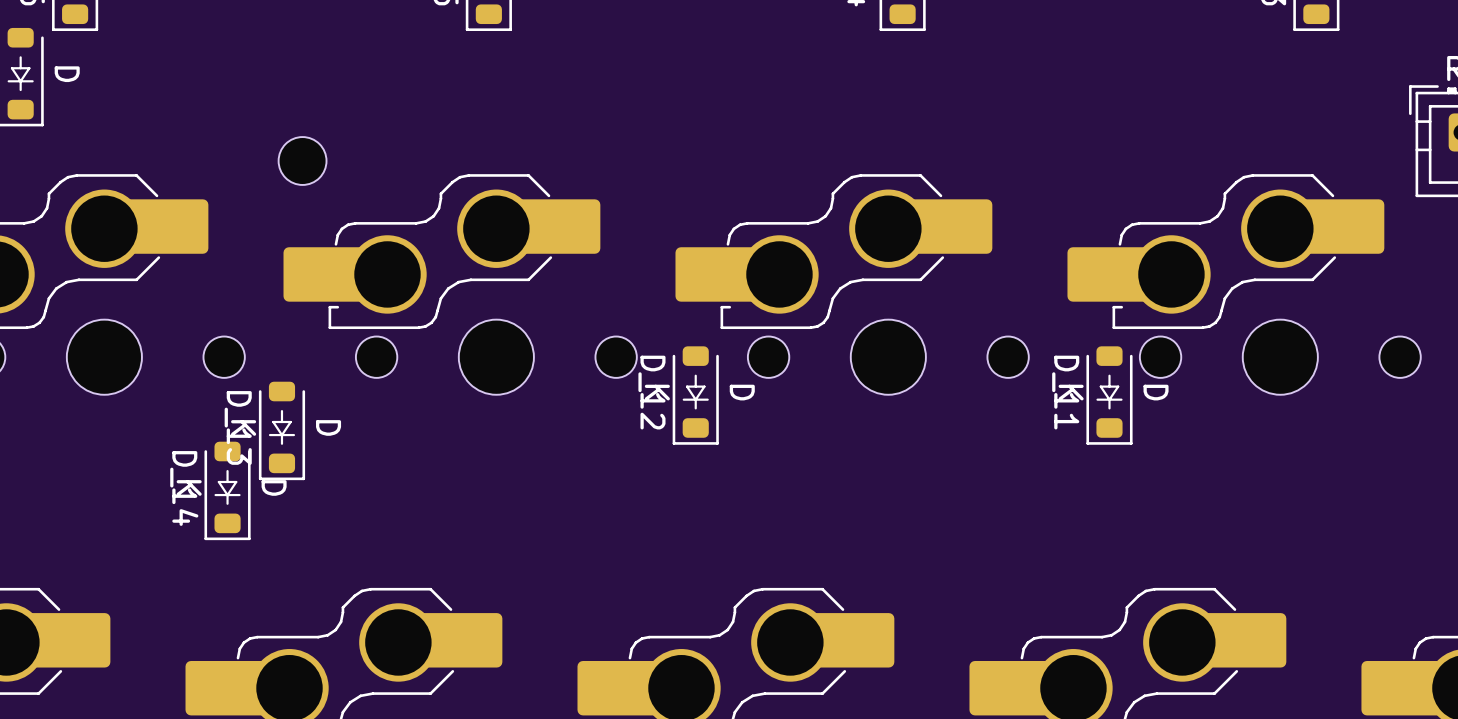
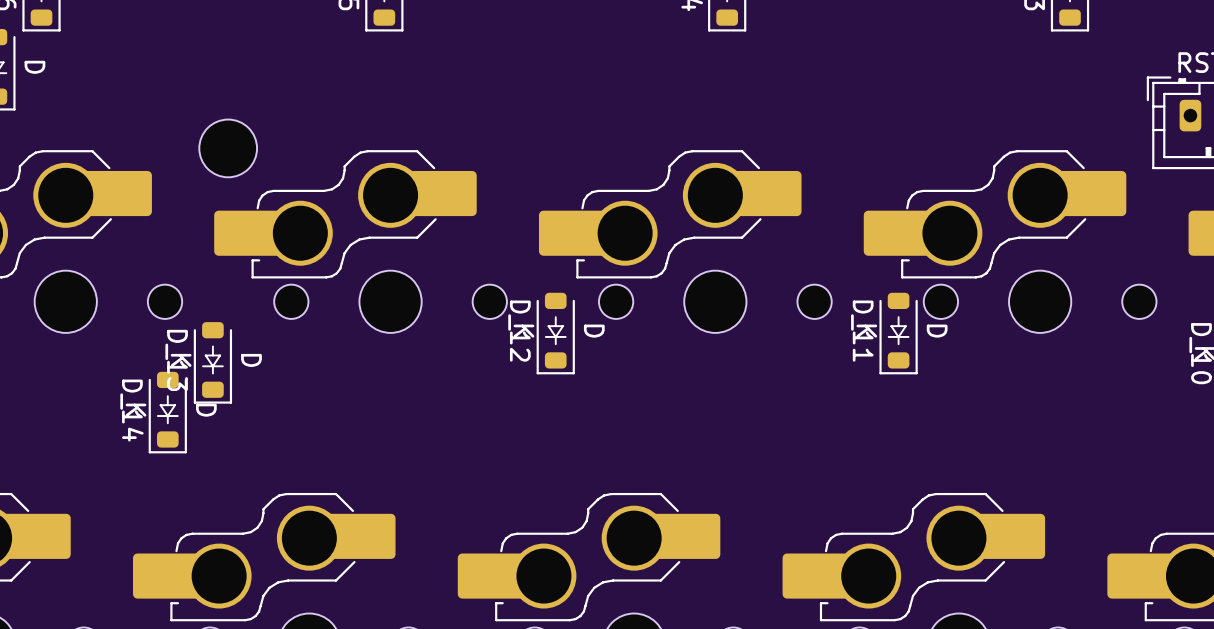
part footprint: [278, 137, 327, 185] -> [199, 119, 258, 178]

